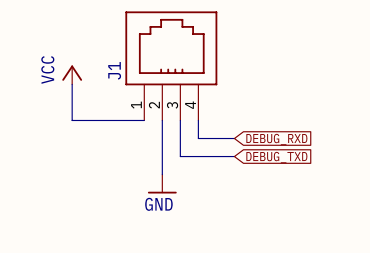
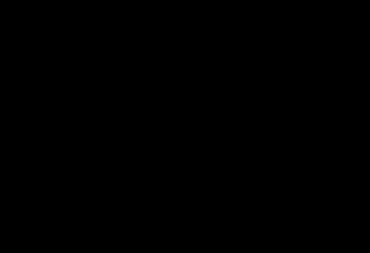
J1: (171, 65) -> none
power symbol: VCC (72, 74) -> none
wire: (72, 84) (72, 120) (144, 120) -> none
wire: (162, 120) (162, 174) -> none
wire: (180, 120) (180, 156) (234, 156) -> none
wire: (198, 120) (198, 138) (234, 138) -> none
global label: DEBUG_RXD (276, 139) -> none
global label: DEBUG_TXD (276, 157) -> none
power symbol: GND (162, 184) -> none

